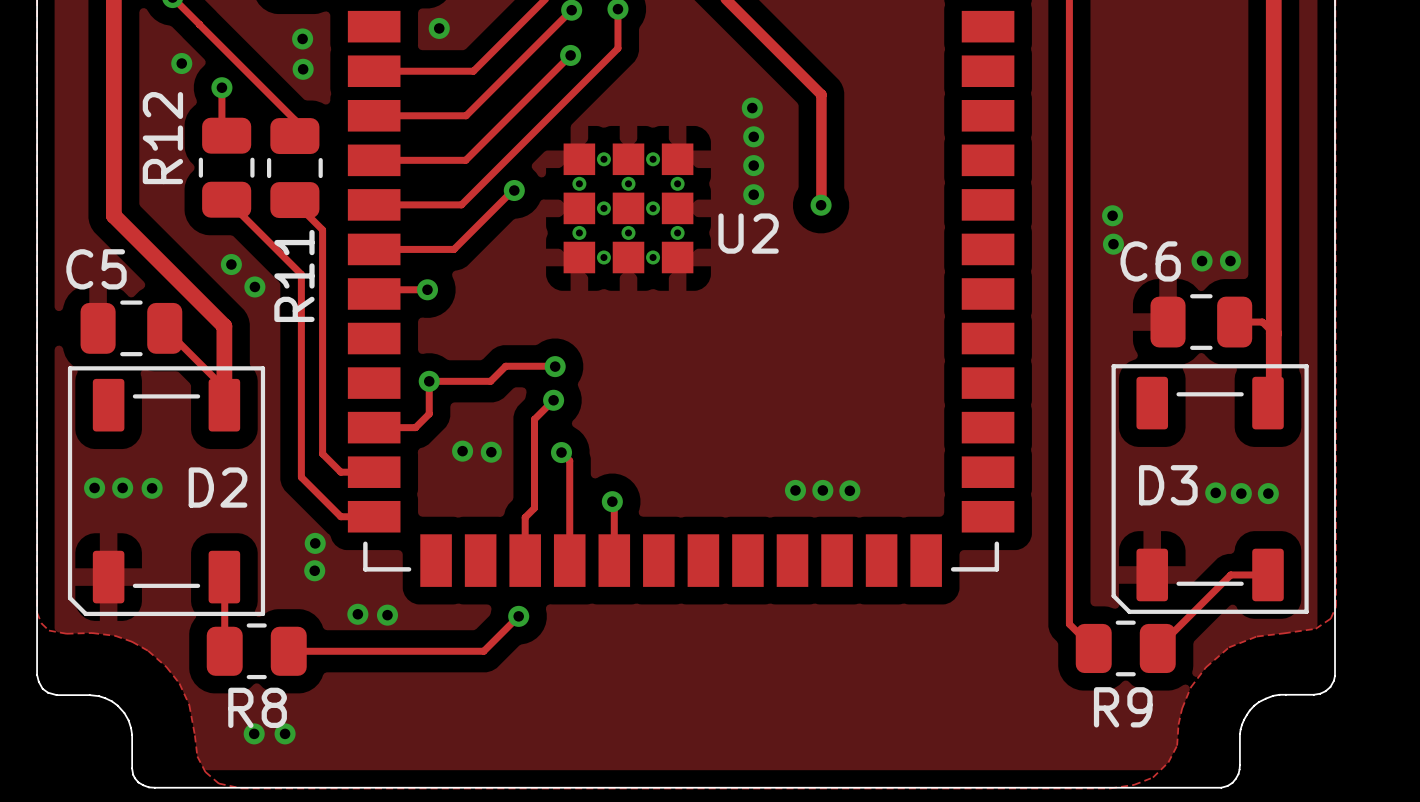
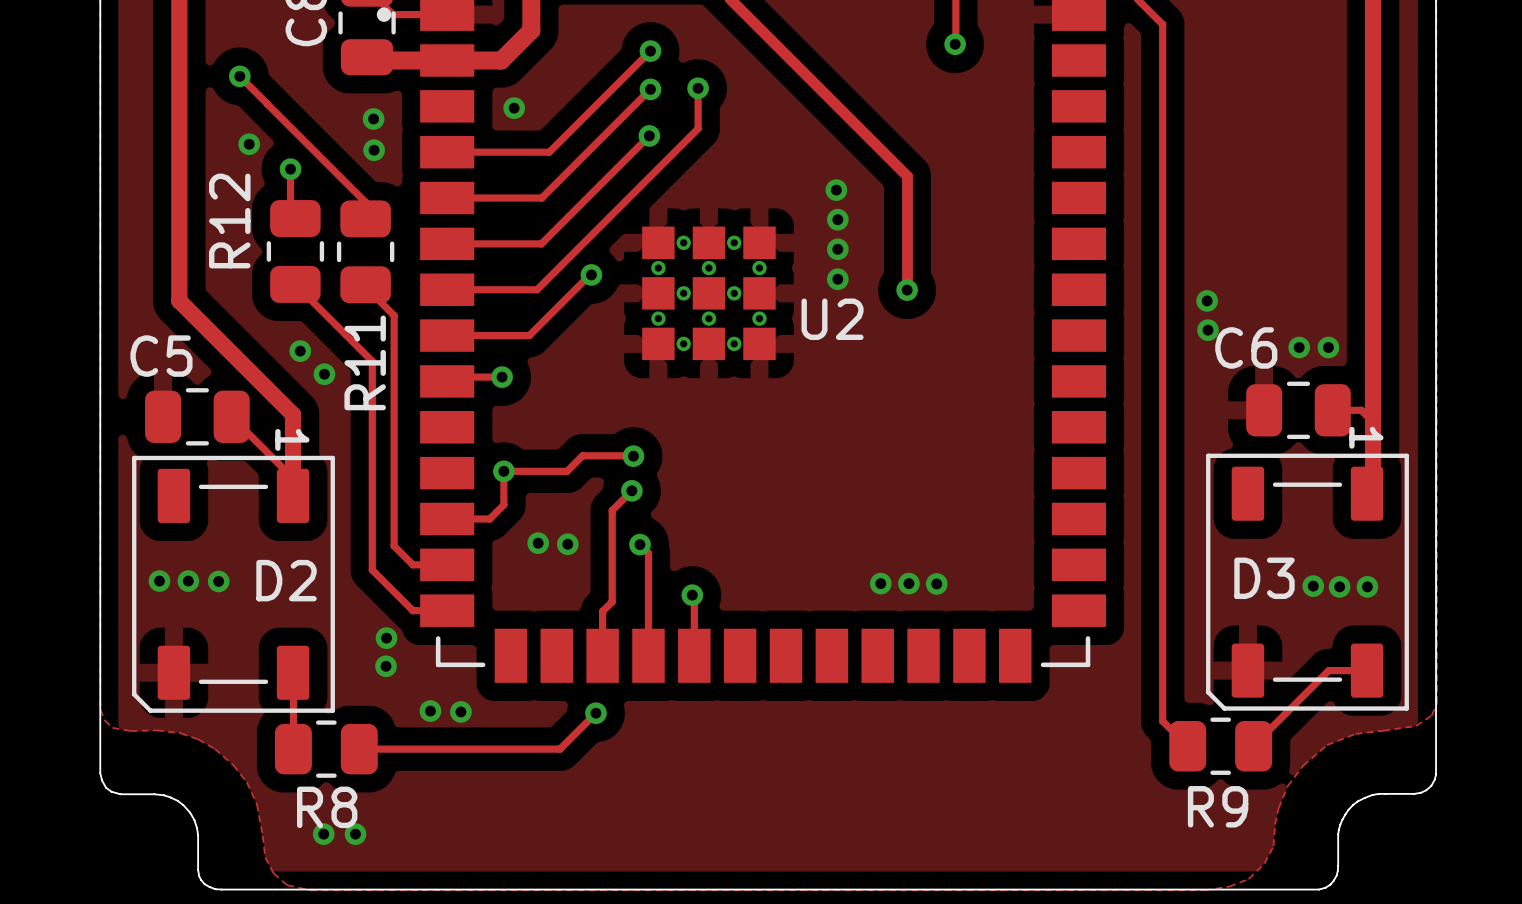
D3 text: none -> 1 (1366, 437)
D2 text: none -> 1 (292, 439)

